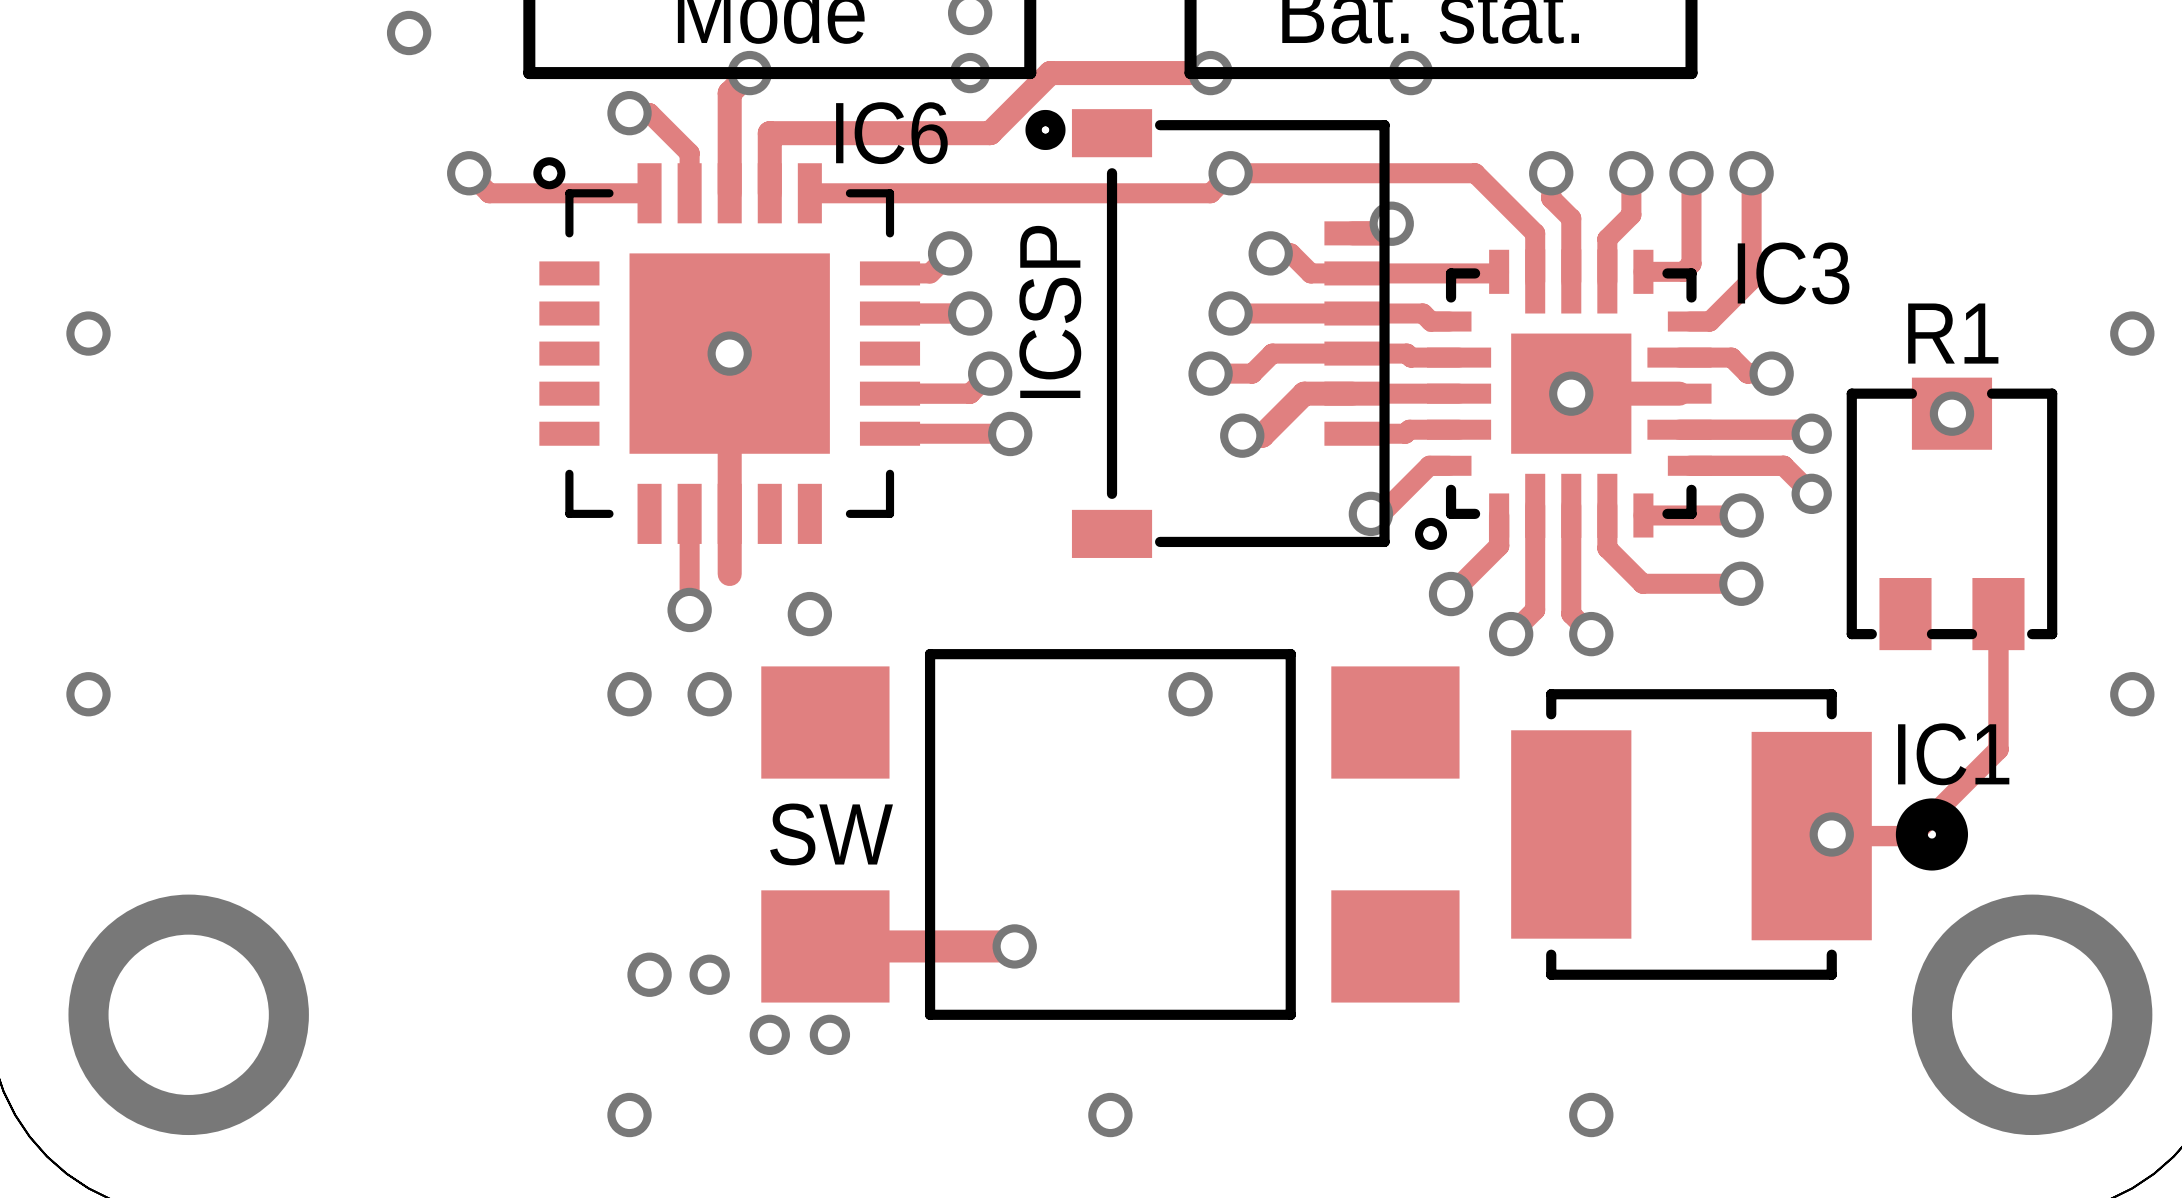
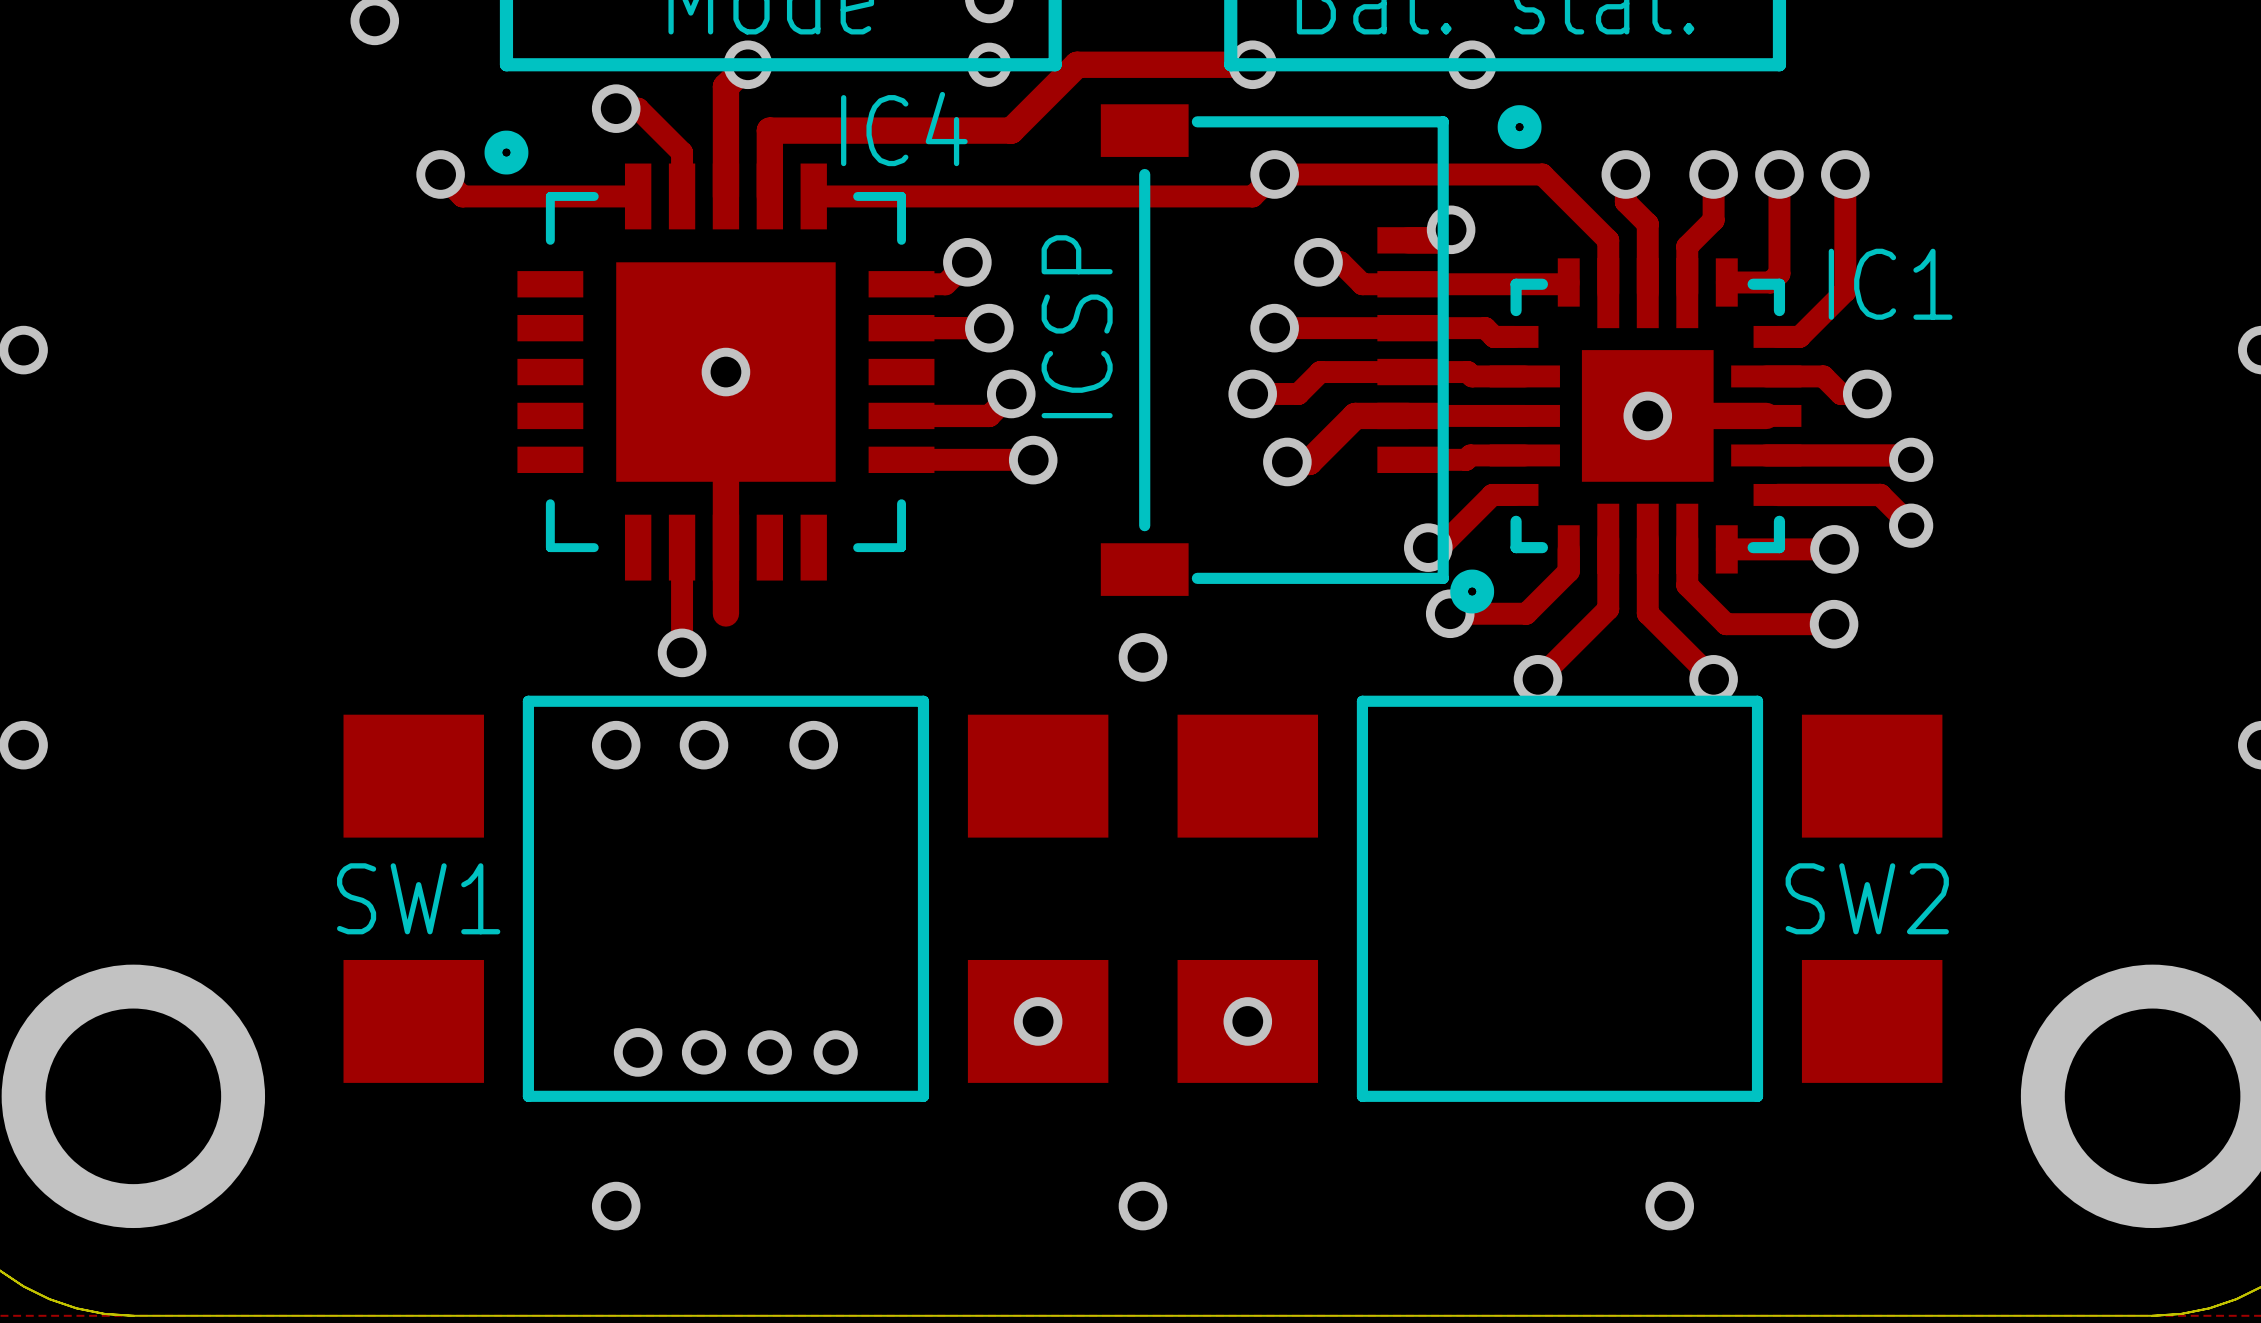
ICSP footprint: [1025, 109, 1390, 558] -> [1100, 104, 1542, 596]
IC4: none -> (709, 355)
IC6: (726, 350) -> none
IC3: (1563, 399) -> none
via: (1951, 413) -> none
R1: (1951, 513) -> none
track: (1499, 535) (1499, 545) (1451, 594) -> (1568, 571) (1526, 613) (1450, 613)
track: (1535, 569) (1535, 610) (1511, 634) -> (1608, 609) (1538, 679)
track: (1571, 573) (1571, 614) (1591, 634) -> (1647, 613) (1713, 679)
via: none -> (1450, 613)
via: (1451, 594) -> none
via position: (809, 614) -> (813, 745)
track: (1998, 614) (1998, 749) (1911, 836) (1811, 836) (1831, 834) -> none
via: none -> (1538, 679)
via: (1511, 634) -> none
via position: (1591, 634) -> (1713, 679)
IC1 footprint: [1511, 689, 1969, 980] -> [1450, 257, 1802, 614]
via position: (1190, 694) -> (1142, 657)
SW1: none -> (725, 898)
SW: (1110, 834) -> none
SW2: none -> (1559, 898)
via: (1831, 834) -> none
track: (825, 946) (1014, 946) -> none
via: none -> (1247, 1021)
via: none -> (769, 1052)
via: none -> (835, 1052)
via: (769, 1034) -> none
via: (829, 1034) -> none

